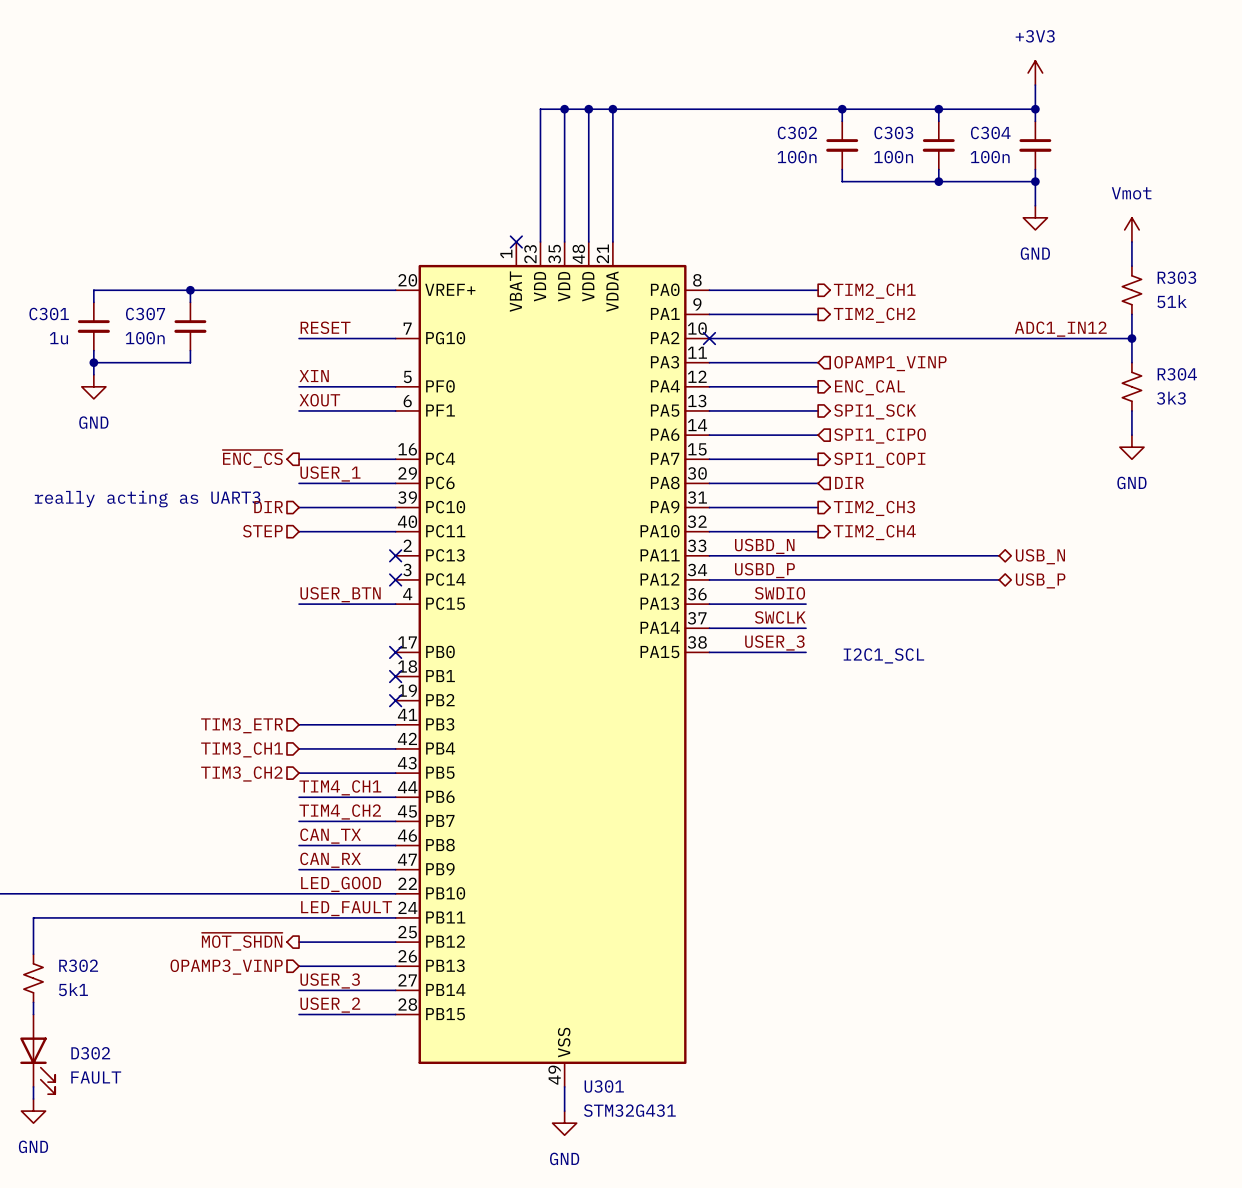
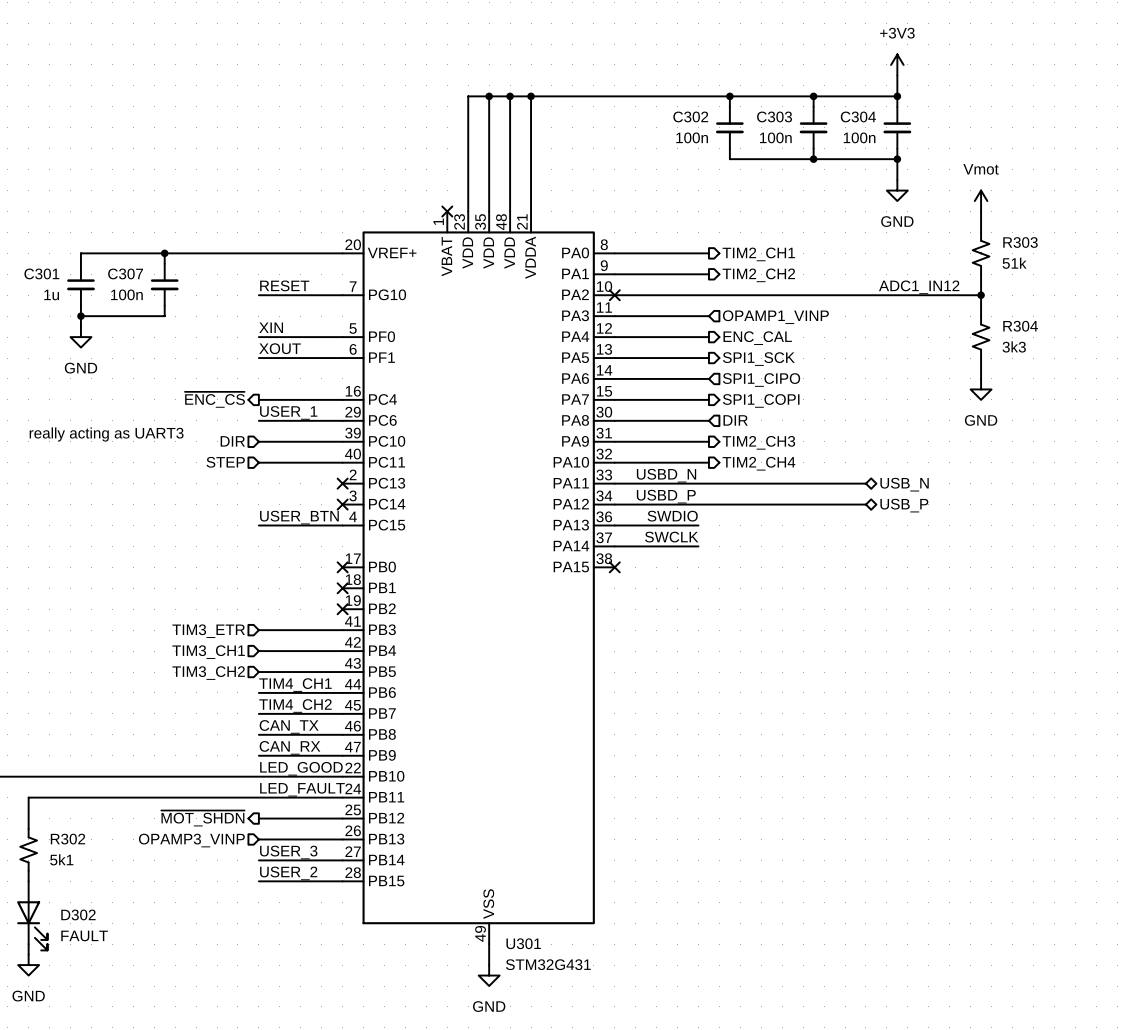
label: USER_3 (774, 642) -> none
wire: (709, 652) (806, 652) -> none
no-connect mark: none -> (614, 567)
text: I2C1_SCL (883, 655) -> none

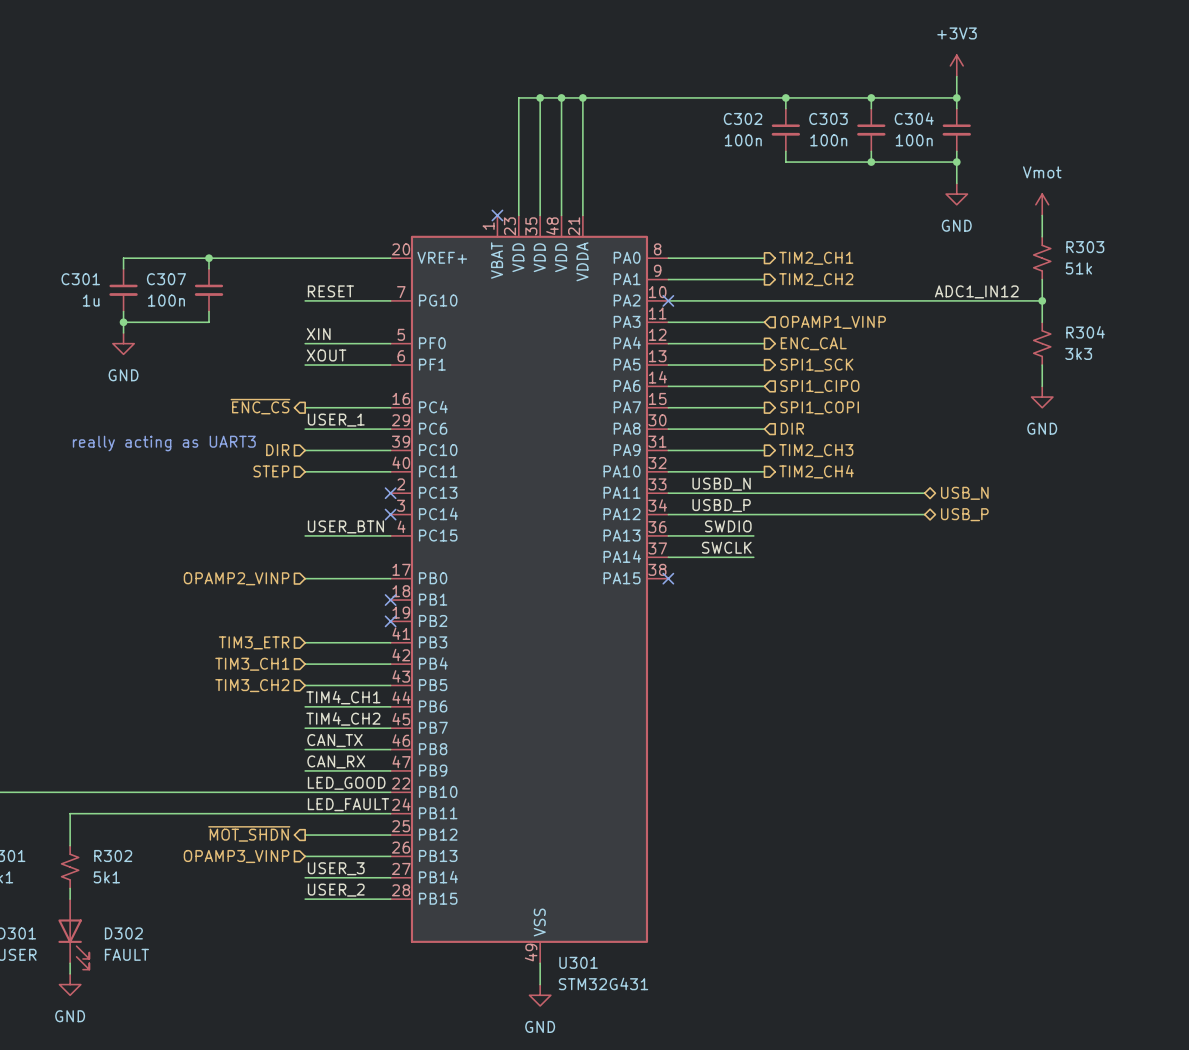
wire: none -> (305, 578) (390, 578)
no-connect mark: (342, 567) -> none
hierarchical label: none -> OPAMP2_VINP (236, 578)

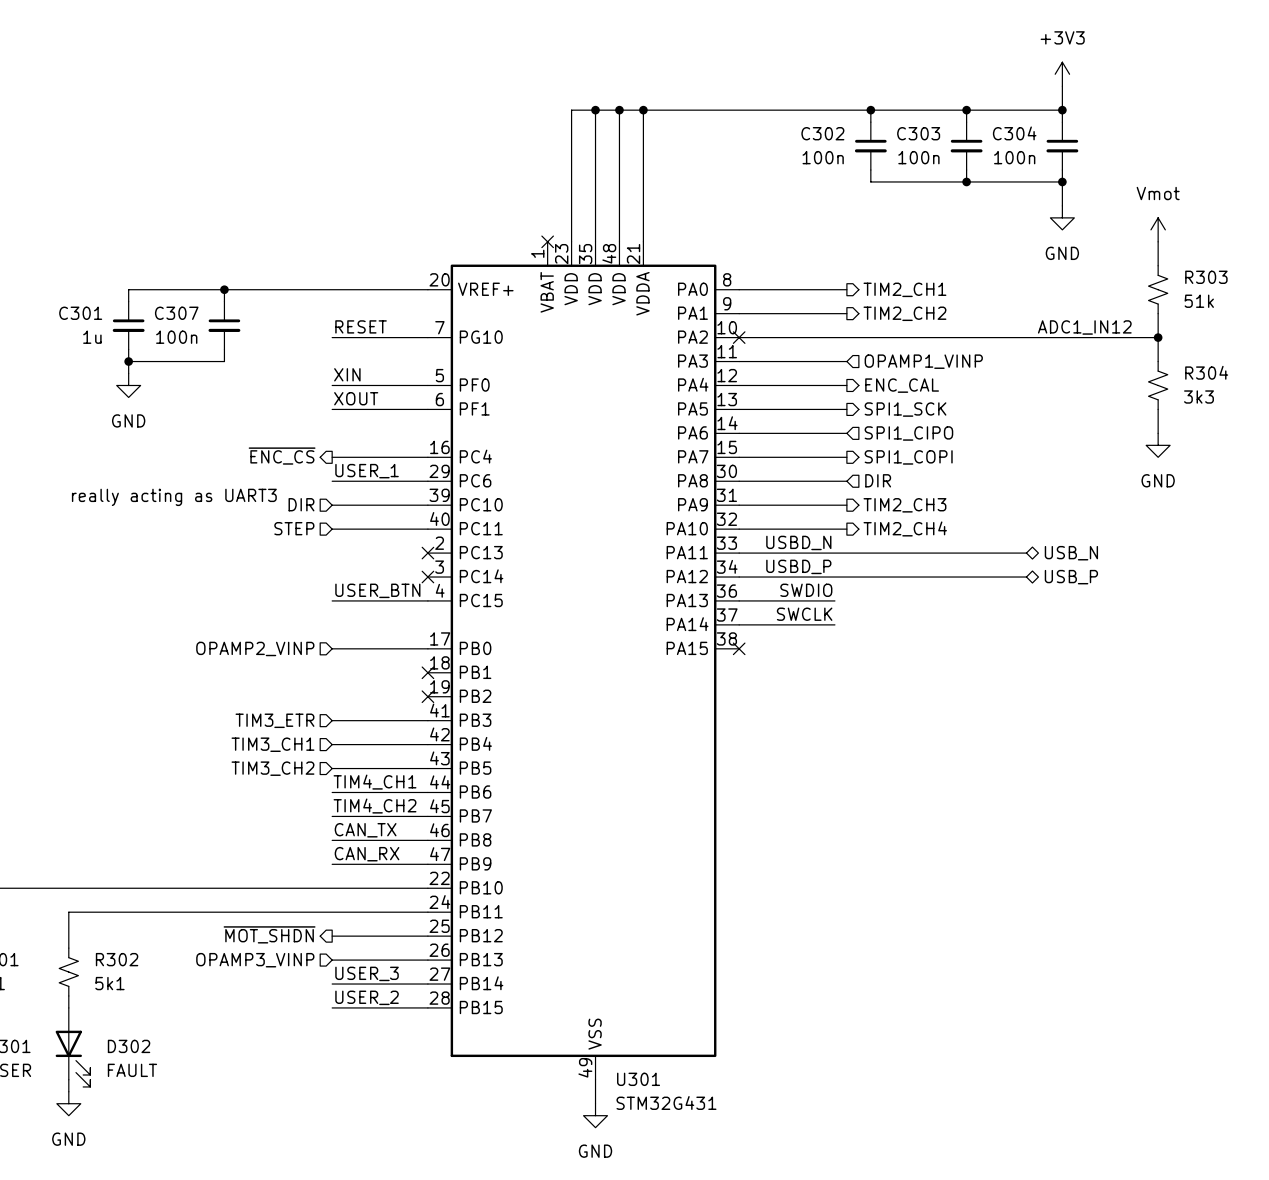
label: LED_GOOD (346, 783) -> none
label: LED_FAULT (348, 804) -> none

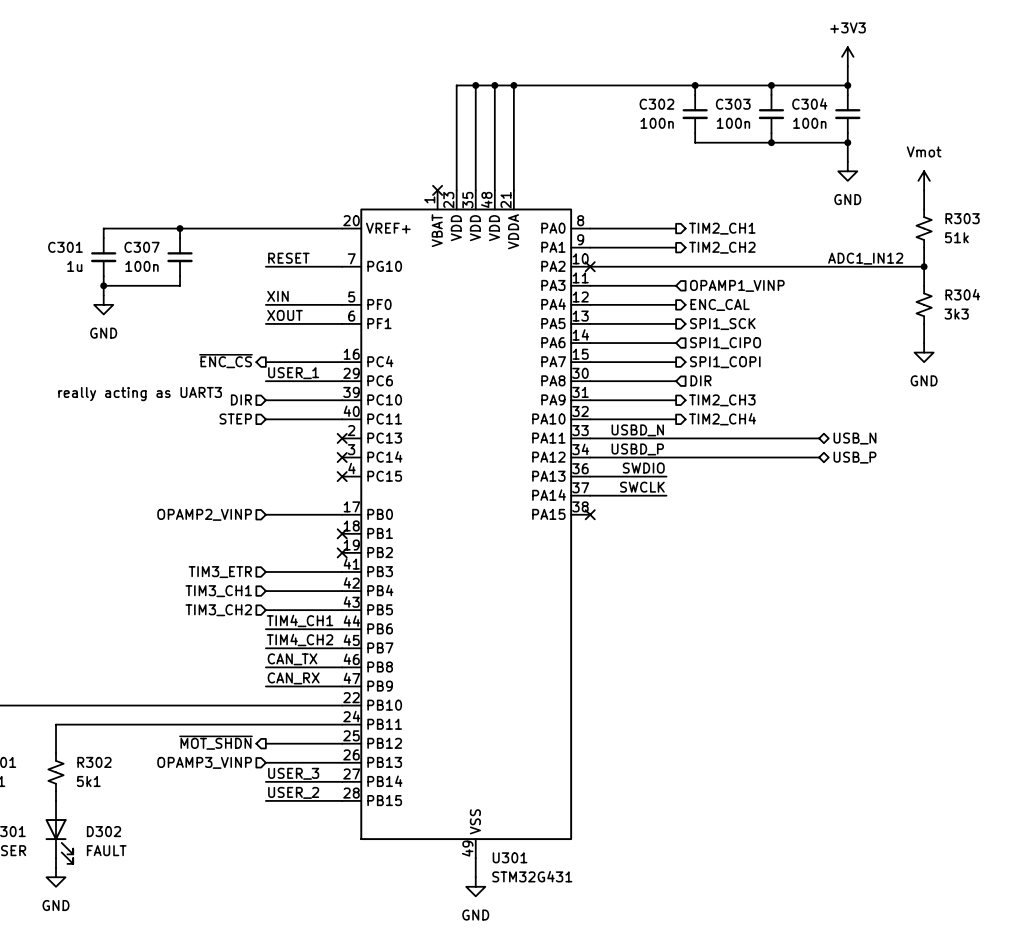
label: USER_BTN (377, 590) -> none
wire: (332, 600) (427, 600) -> none
no-connect mark: none -> (342, 476)

